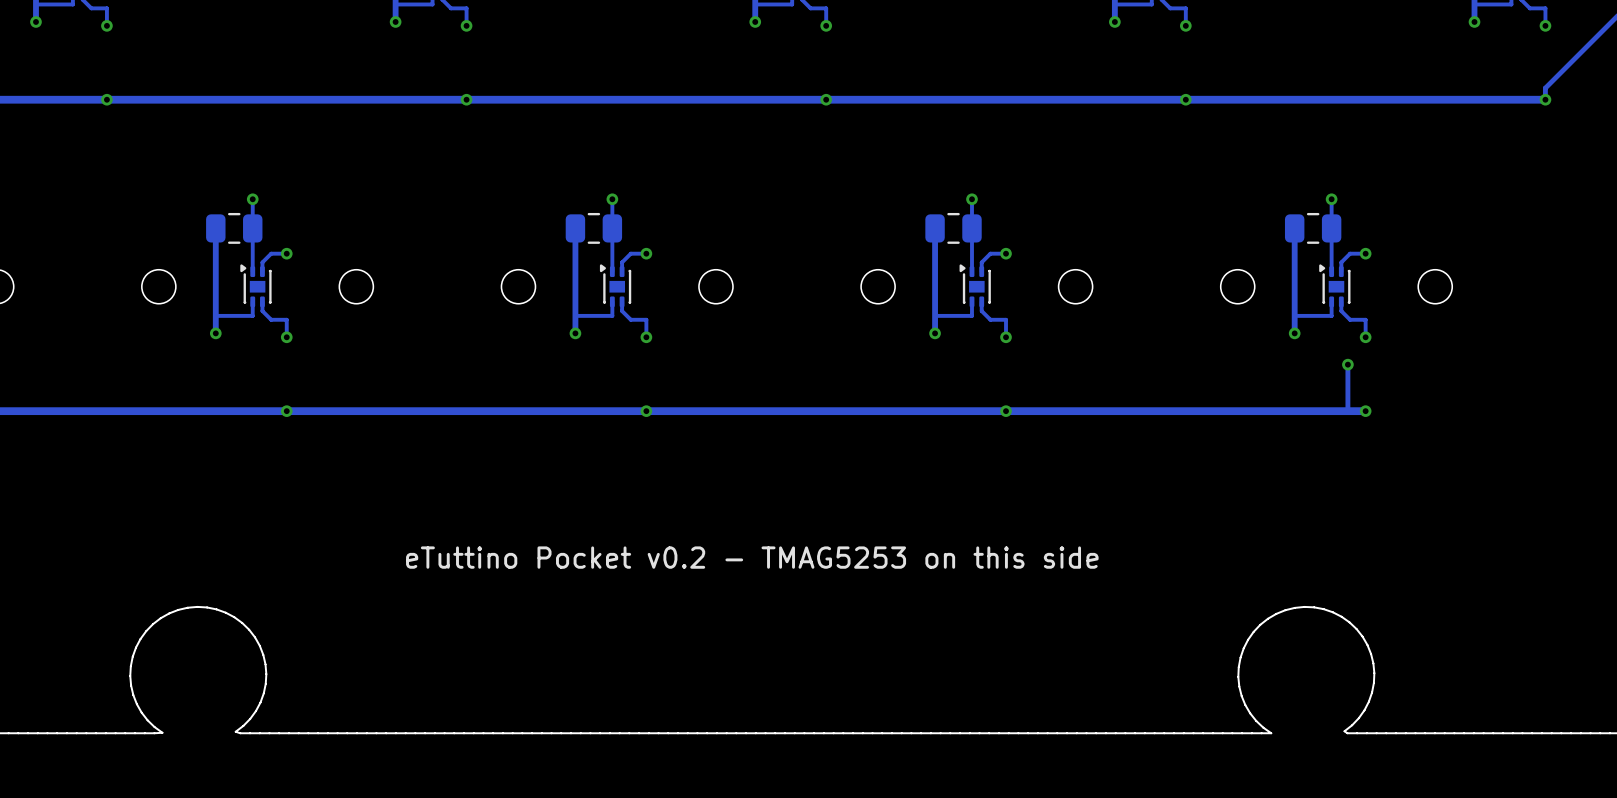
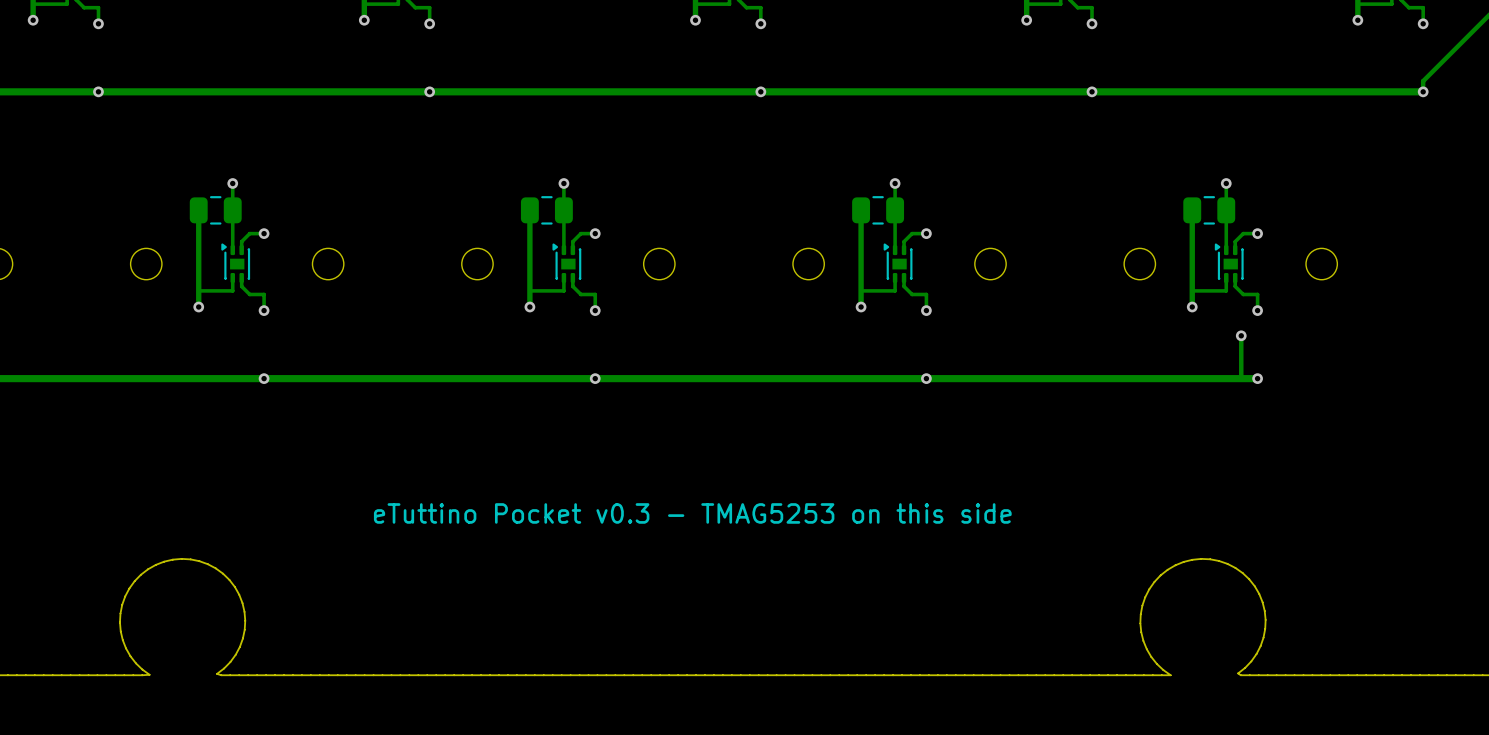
text: eTuttino Pocket v0.2 - TMAG5253 on this side (752, 557) -> eTuttino Pocket v0.3 - TMAG5253 on this side (692, 513)

